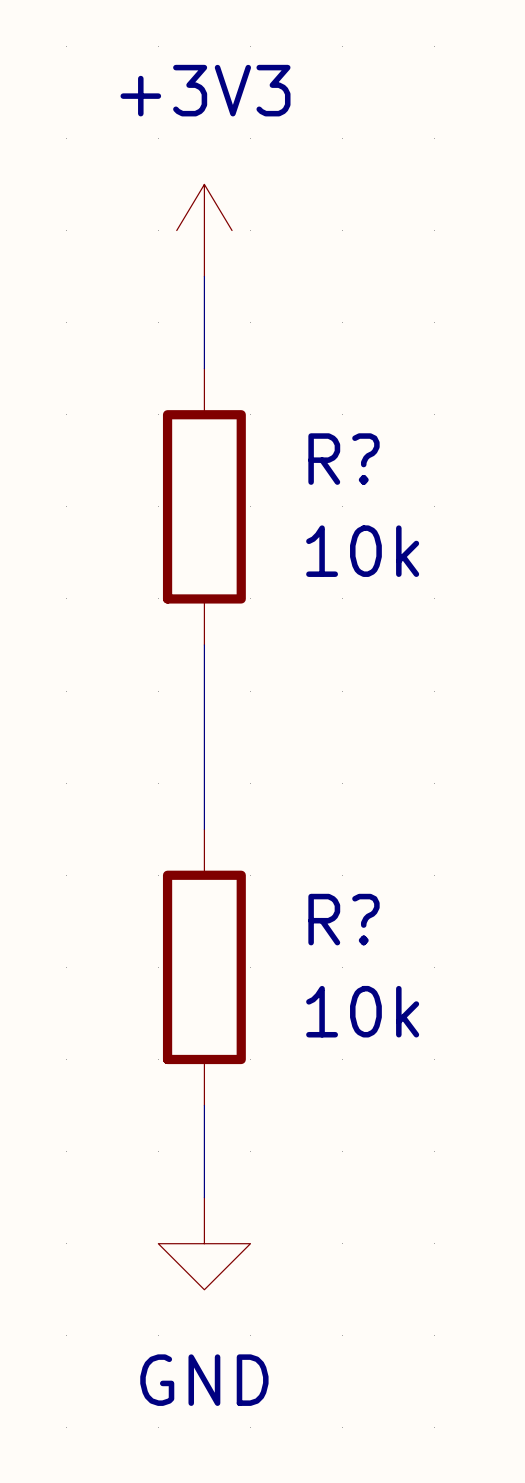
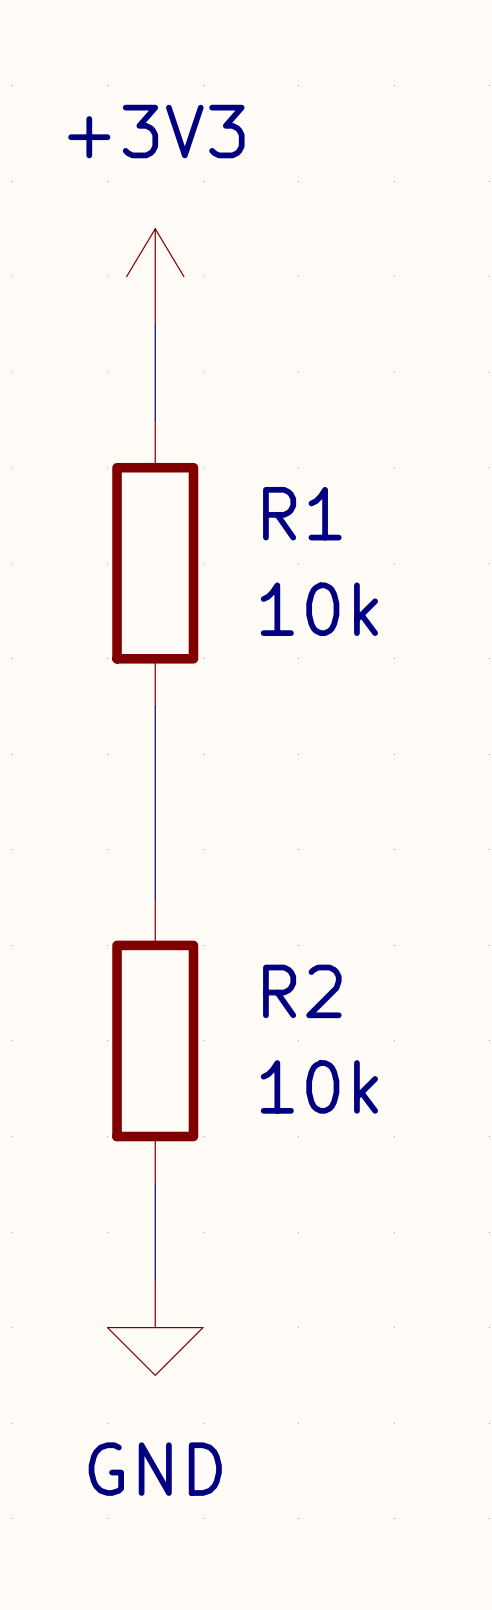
R? name: R? (344, 459) -> R1 (302, 513)
R? name: R? (344, 919) -> R2 (302, 991)

